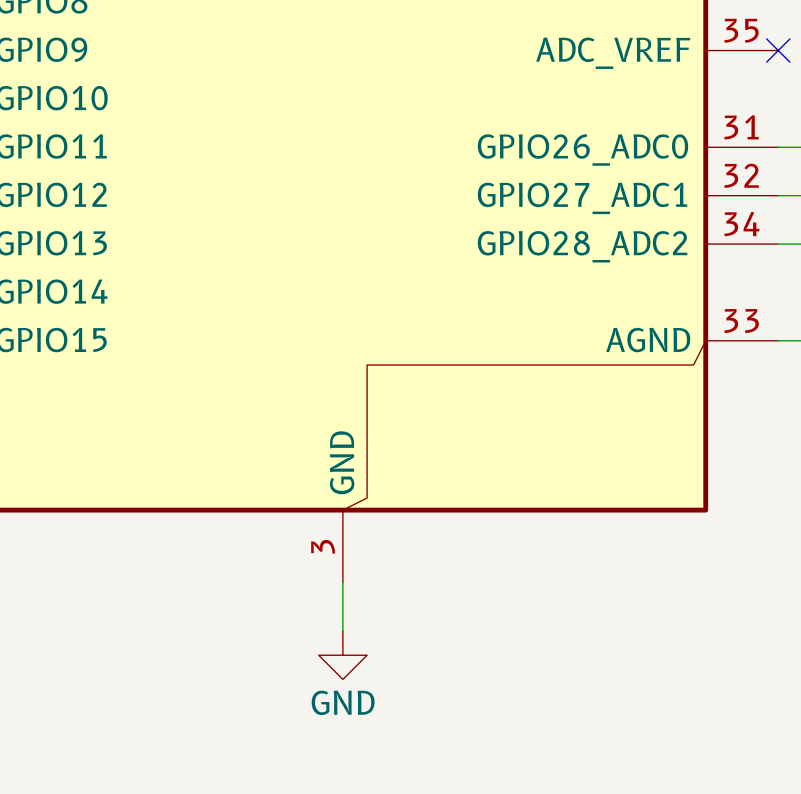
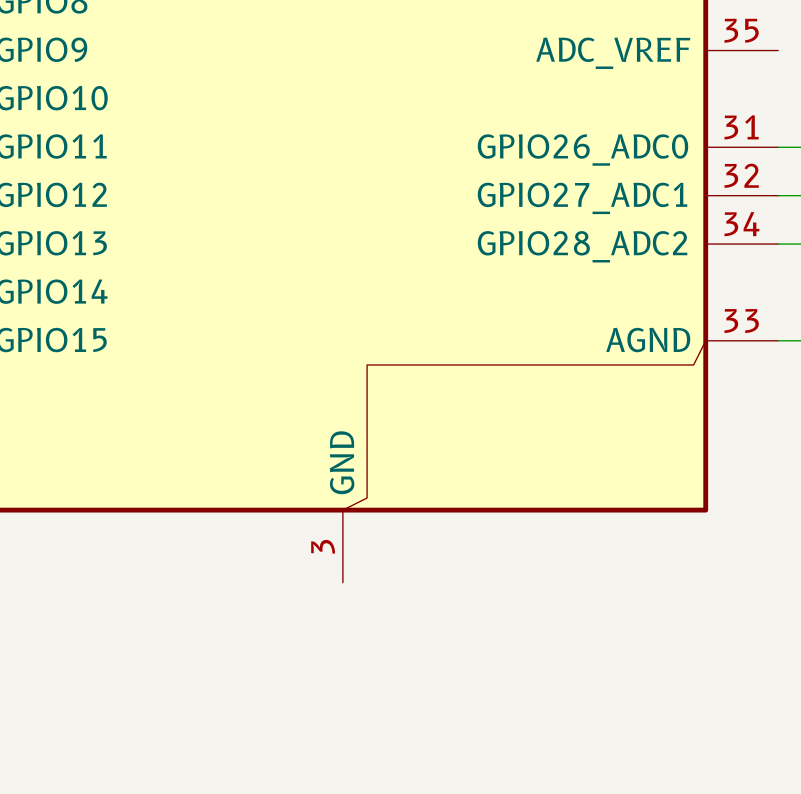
no-connect mark: (778, 50) -> none
wire: (342, 582) (342, 631) -> none
power symbol: GND (342, 655) -> none

